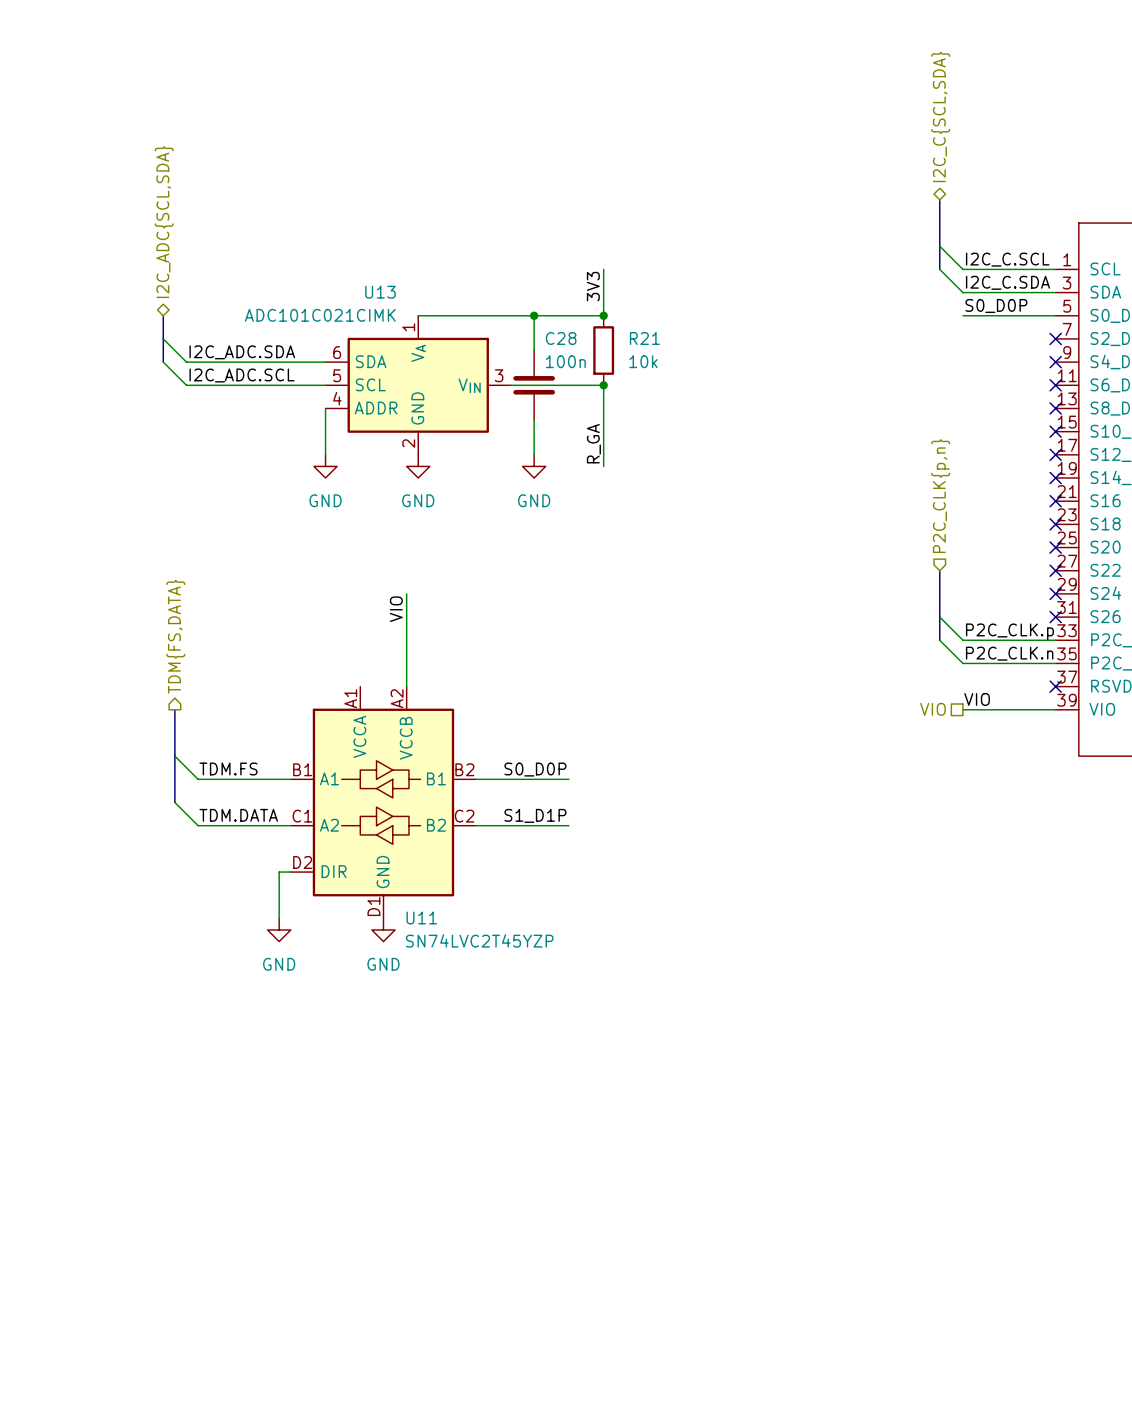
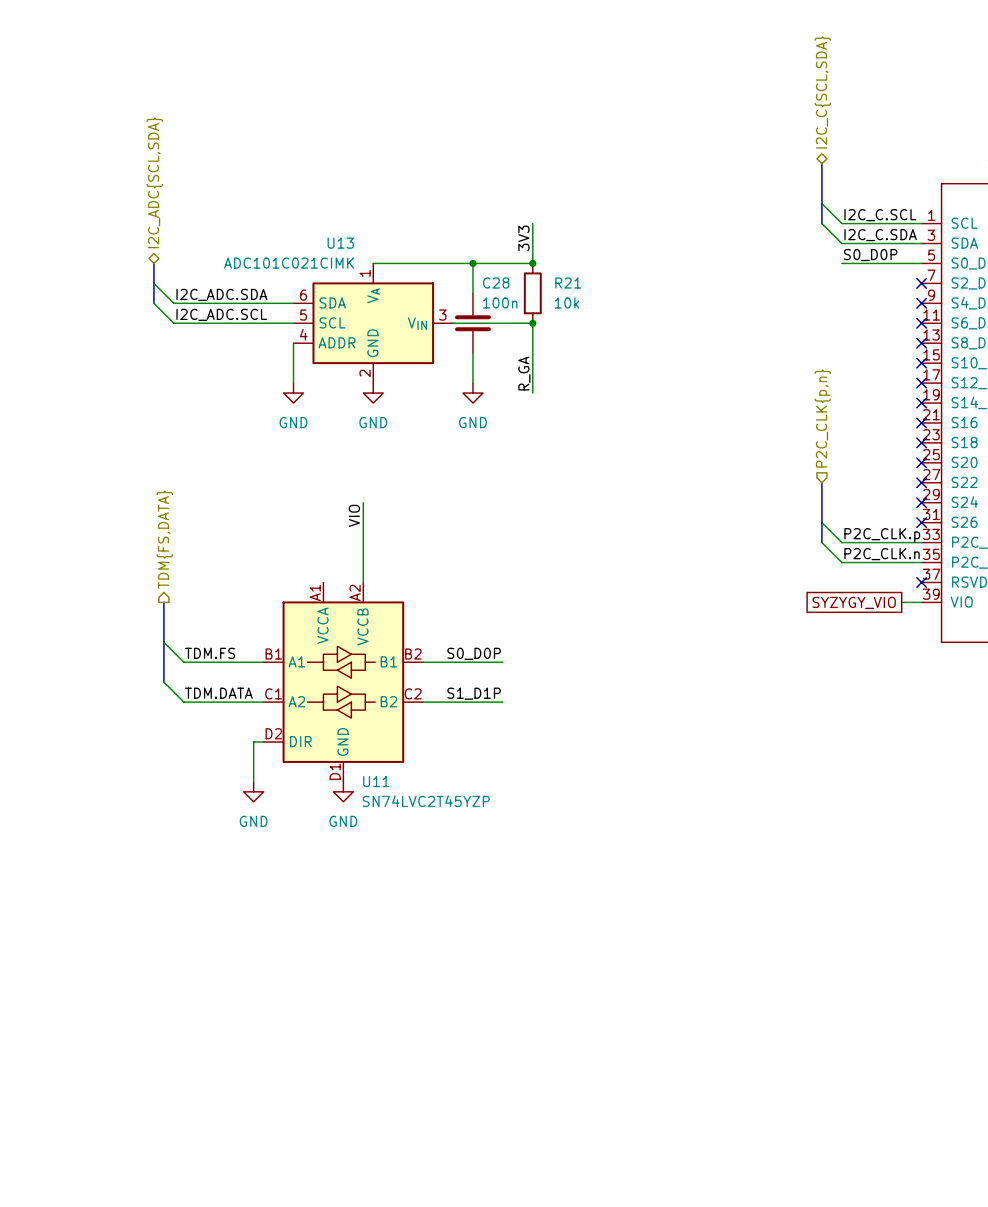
label: VIO (977, 699) -> none
hierarchical label: VIO (932, 709) -> none
wire: (962, 709) (1032, 709) -> none
global label: none -> SYZYGY_VIO (854, 602)

